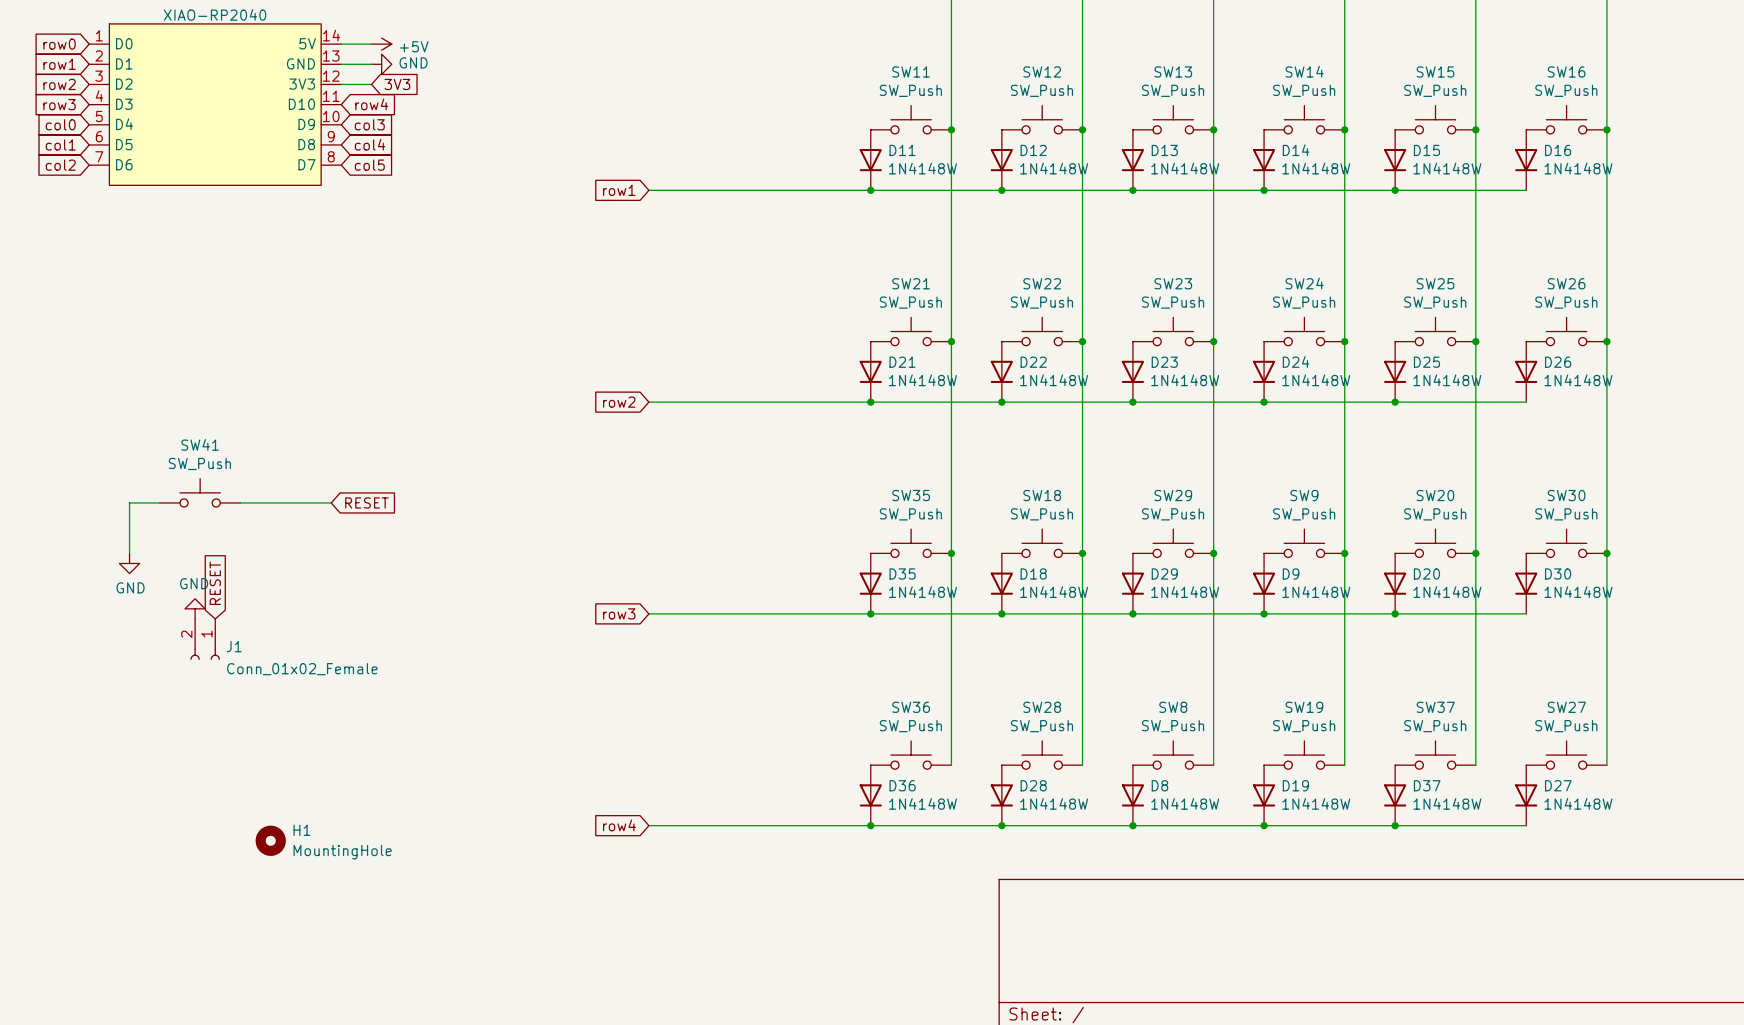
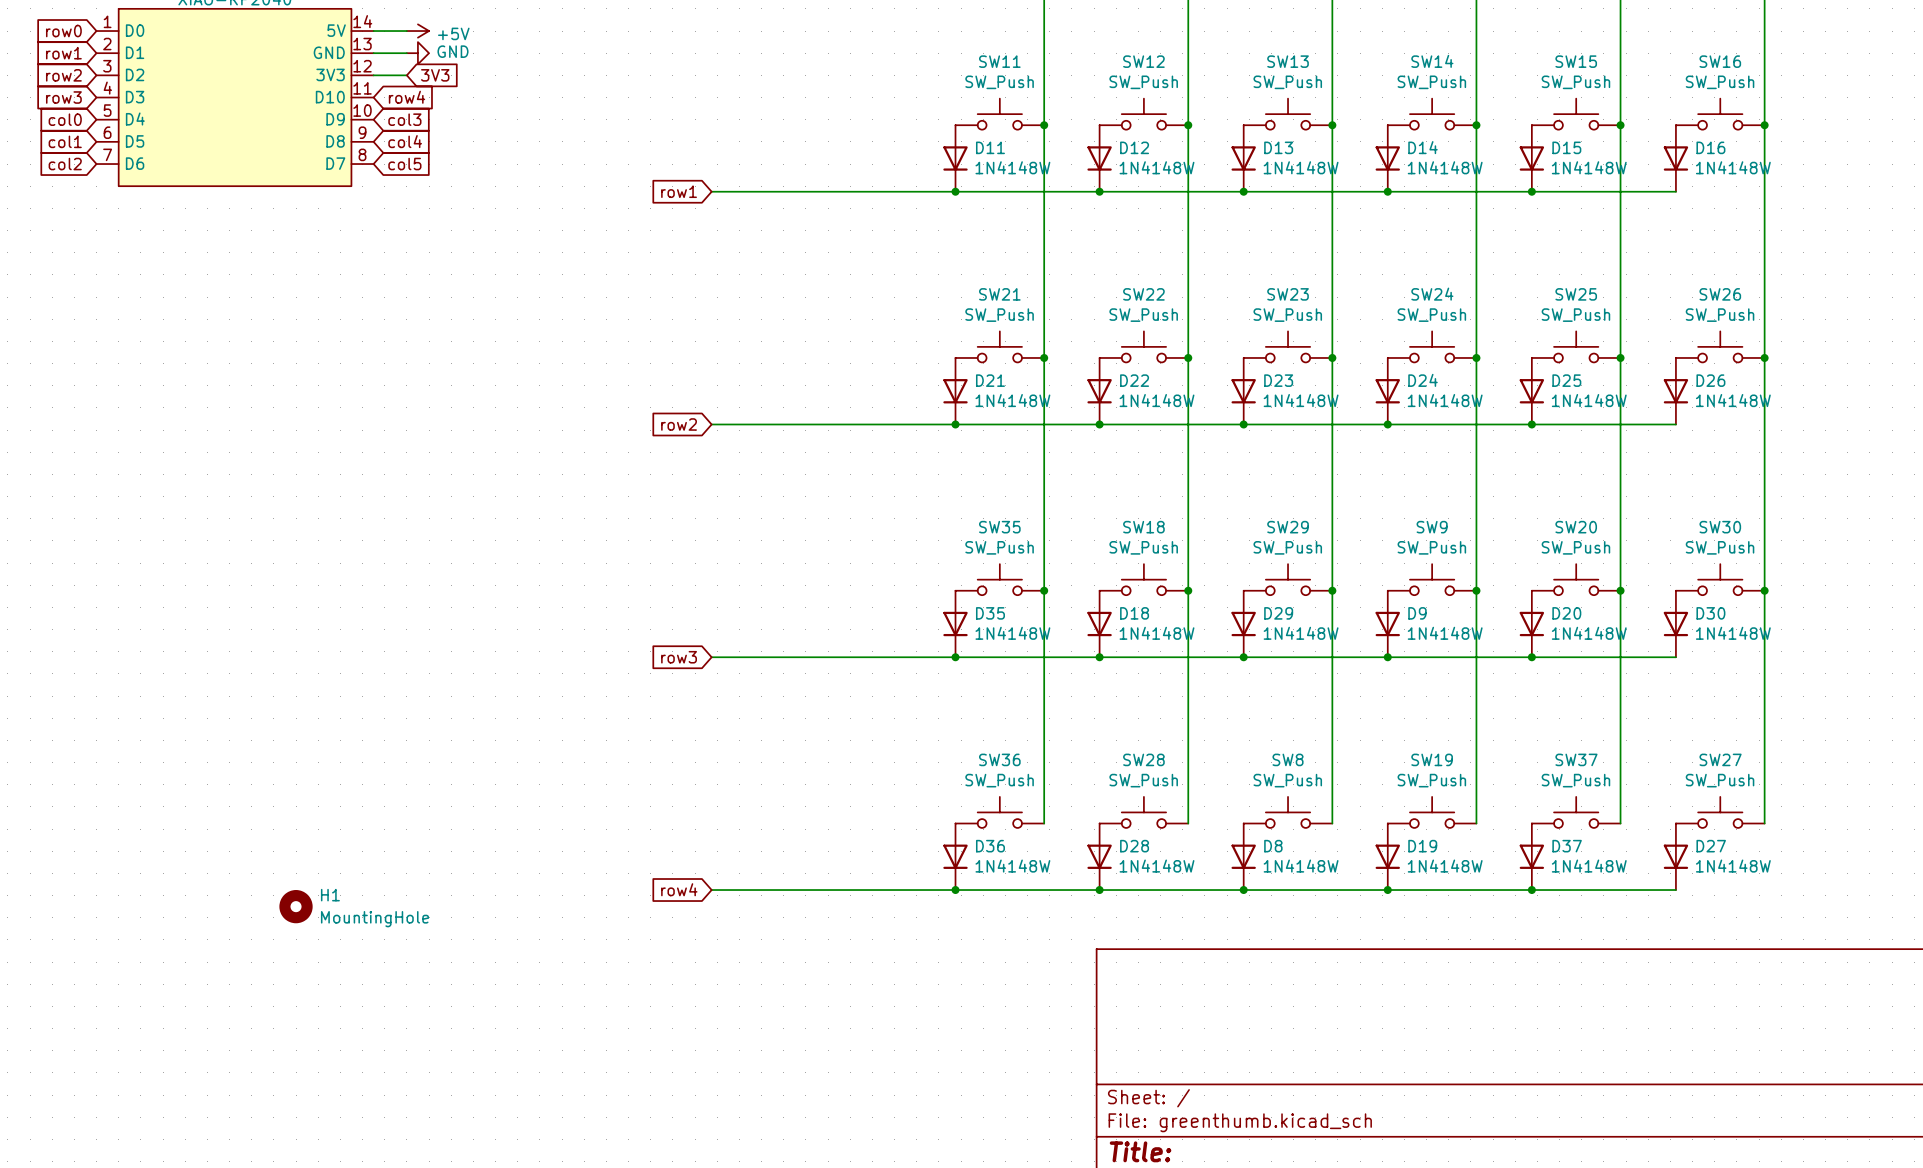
SW41: SW_Push (200, 492) -> none
wire: (159, 502) (129, 502) (129, 553) -> none
wire: (240, 502) (331, 502) -> none
global label: RESET (366, 502) -> none
power symbol: GND (129, 563) -> none
global label: RESET (215, 583) -> none
power symbol: GND (195, 608) -> none
J1: Conn_01x02_Female (205, 639) -> none

